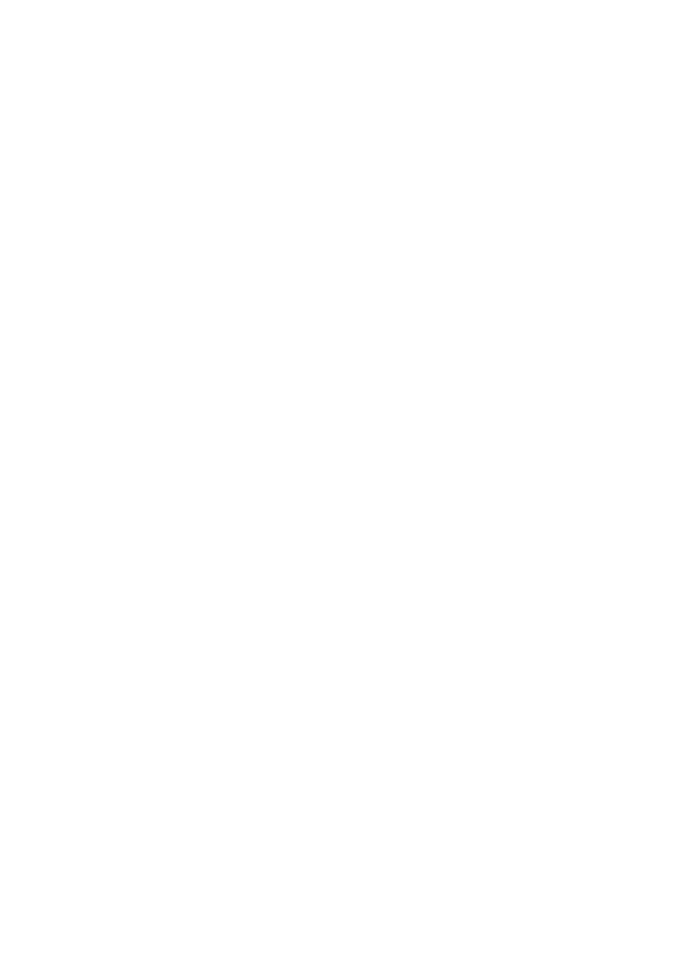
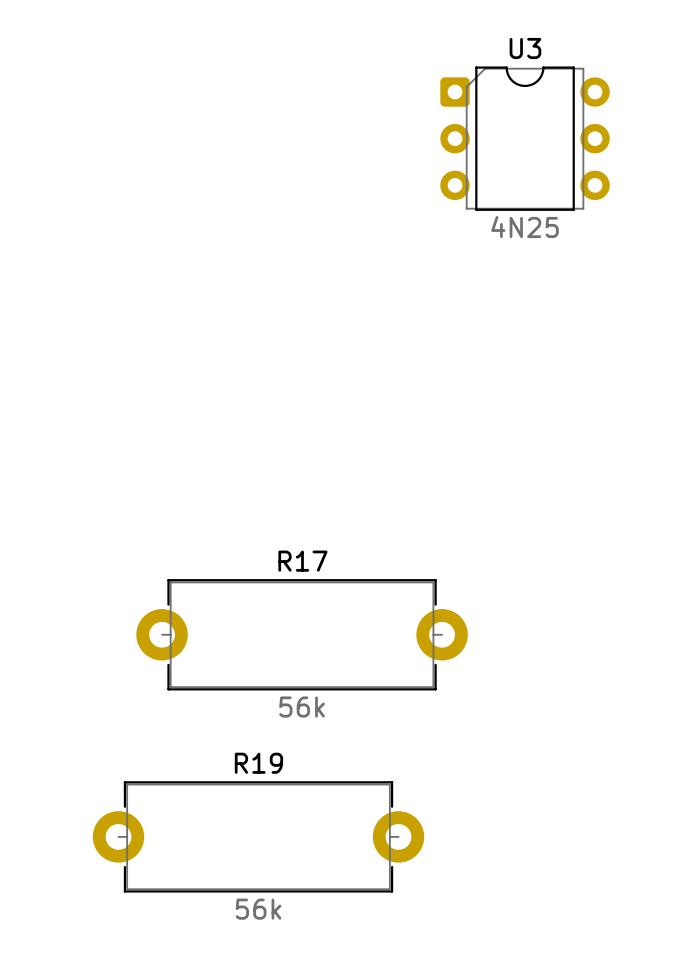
U3: none -> 4N25 (525, 138)
R17: none -> 56k (302, 634)
R19: none -> 56k (258, 836)

